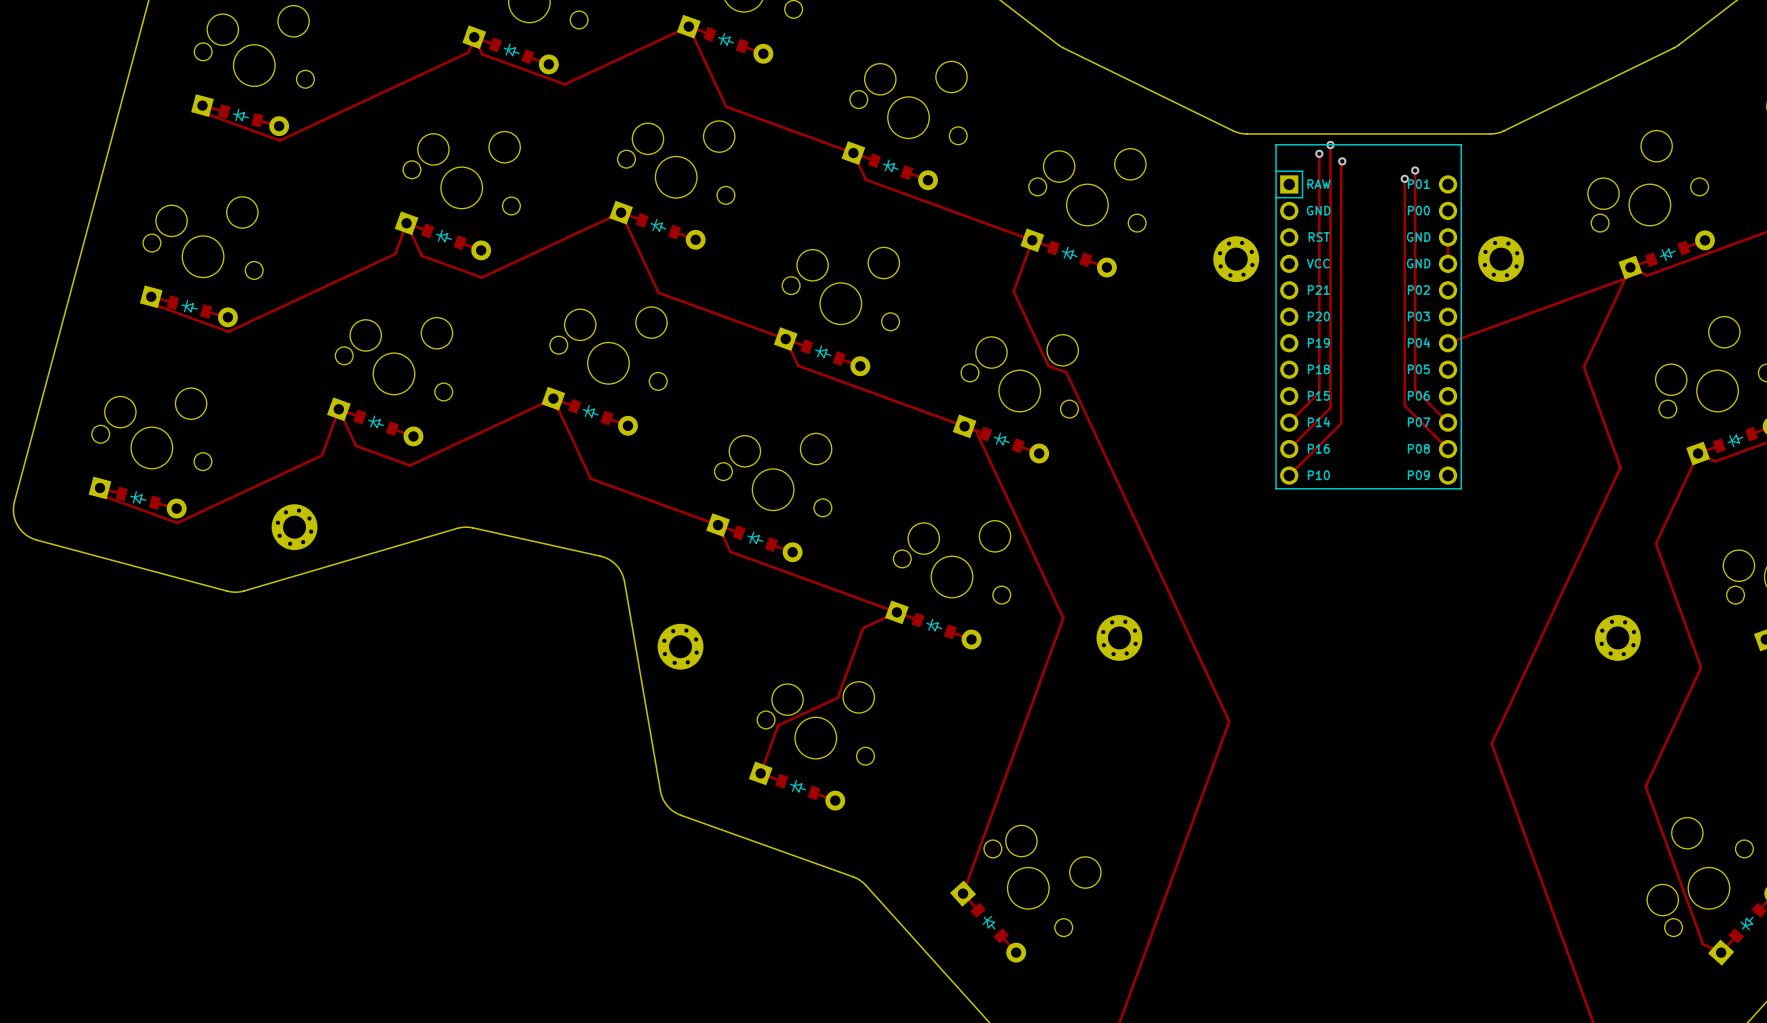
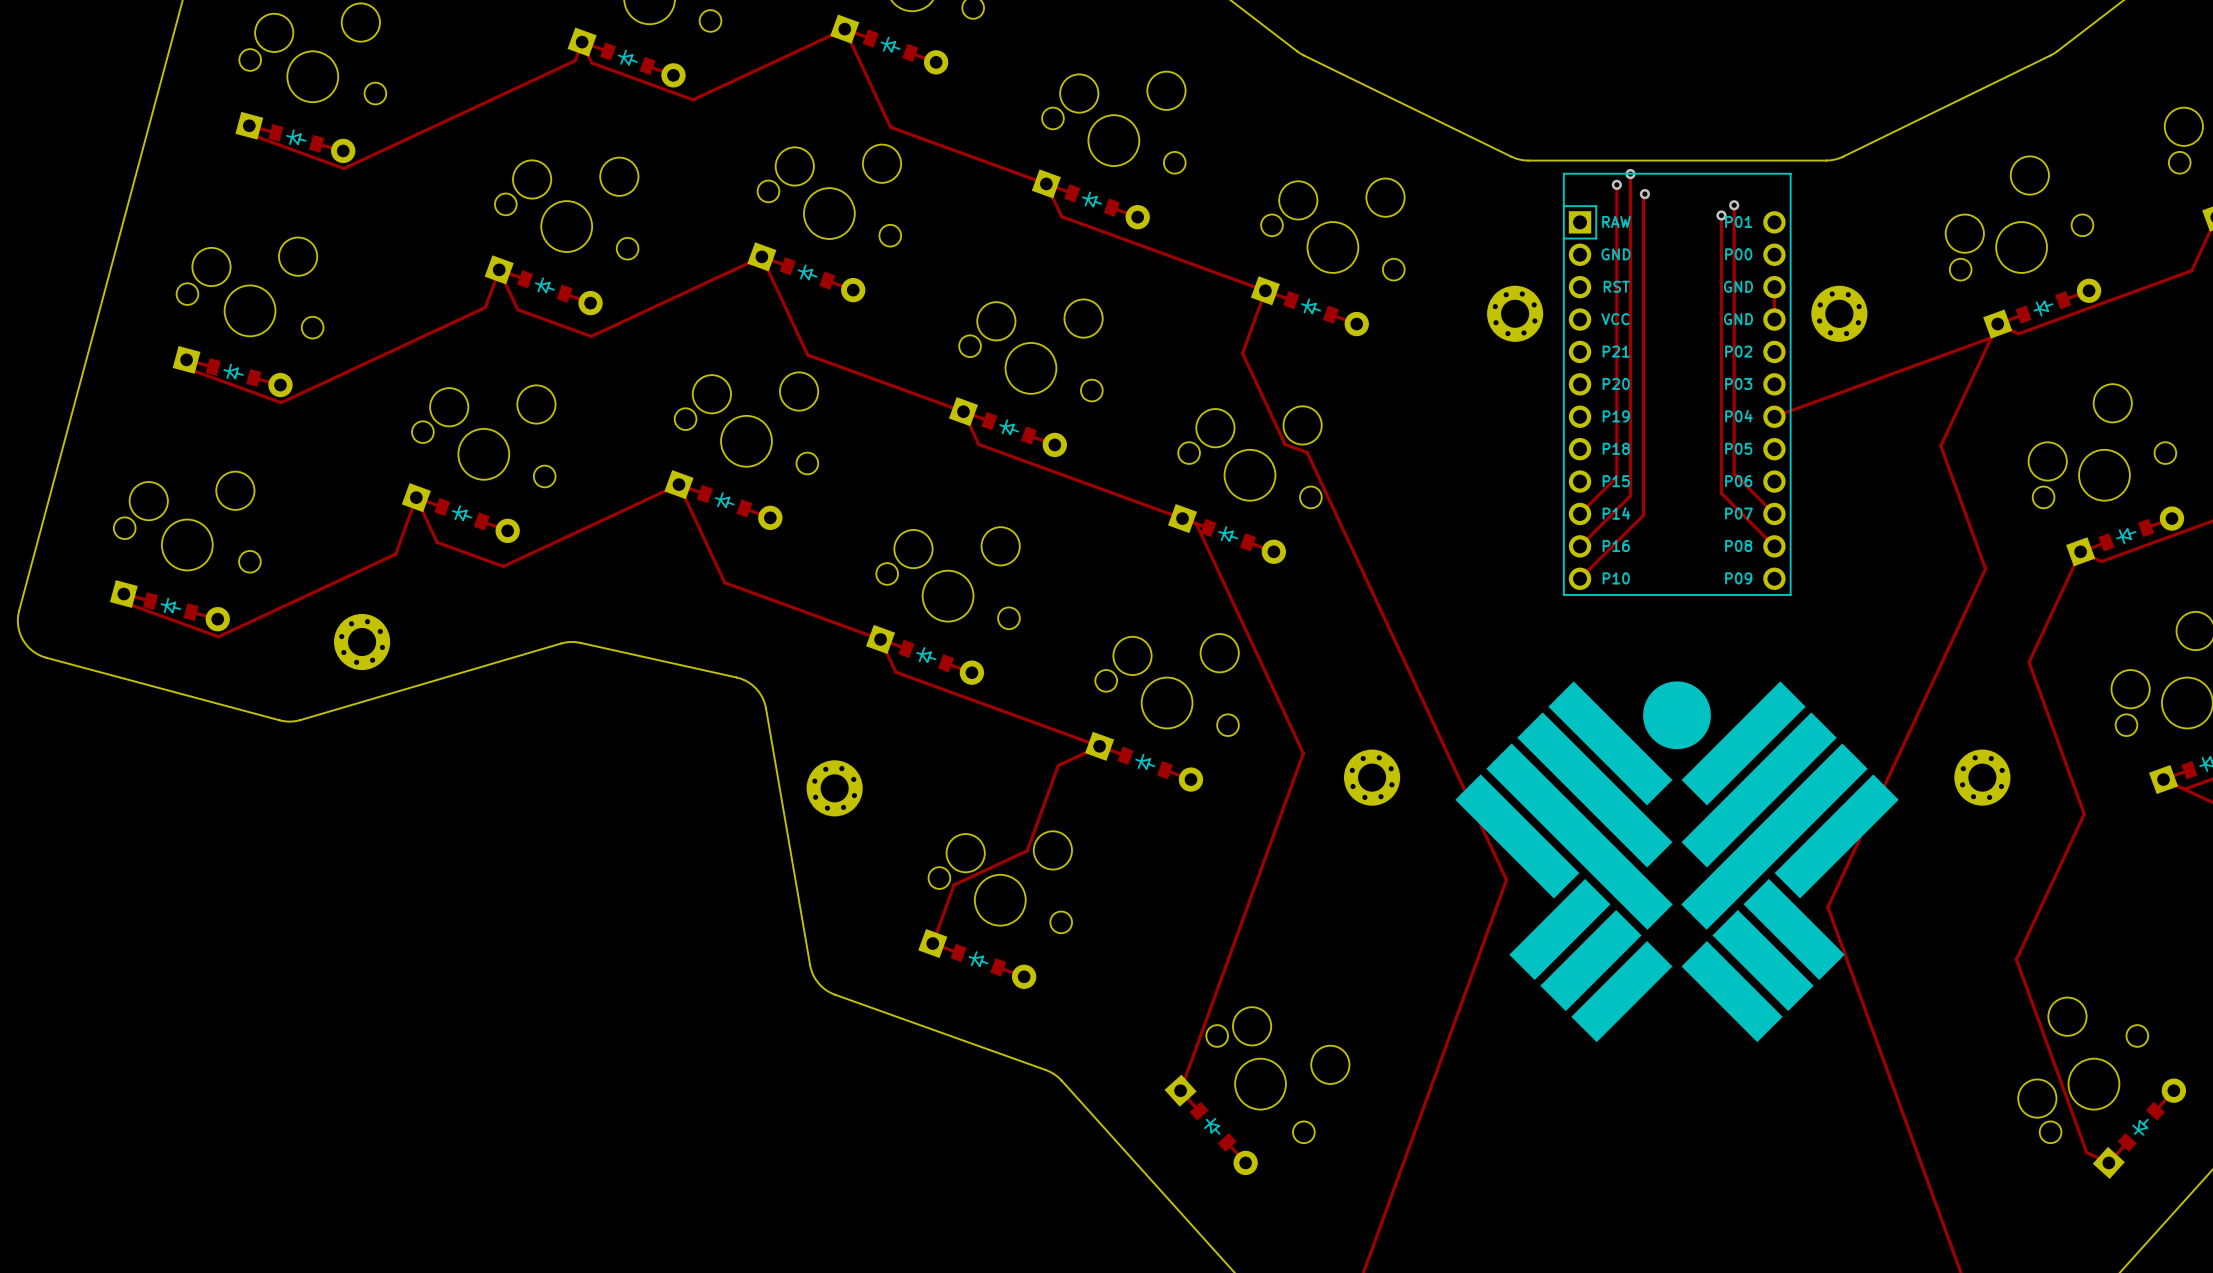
drawing: none -> [1455, 681, 1899, 1043]

